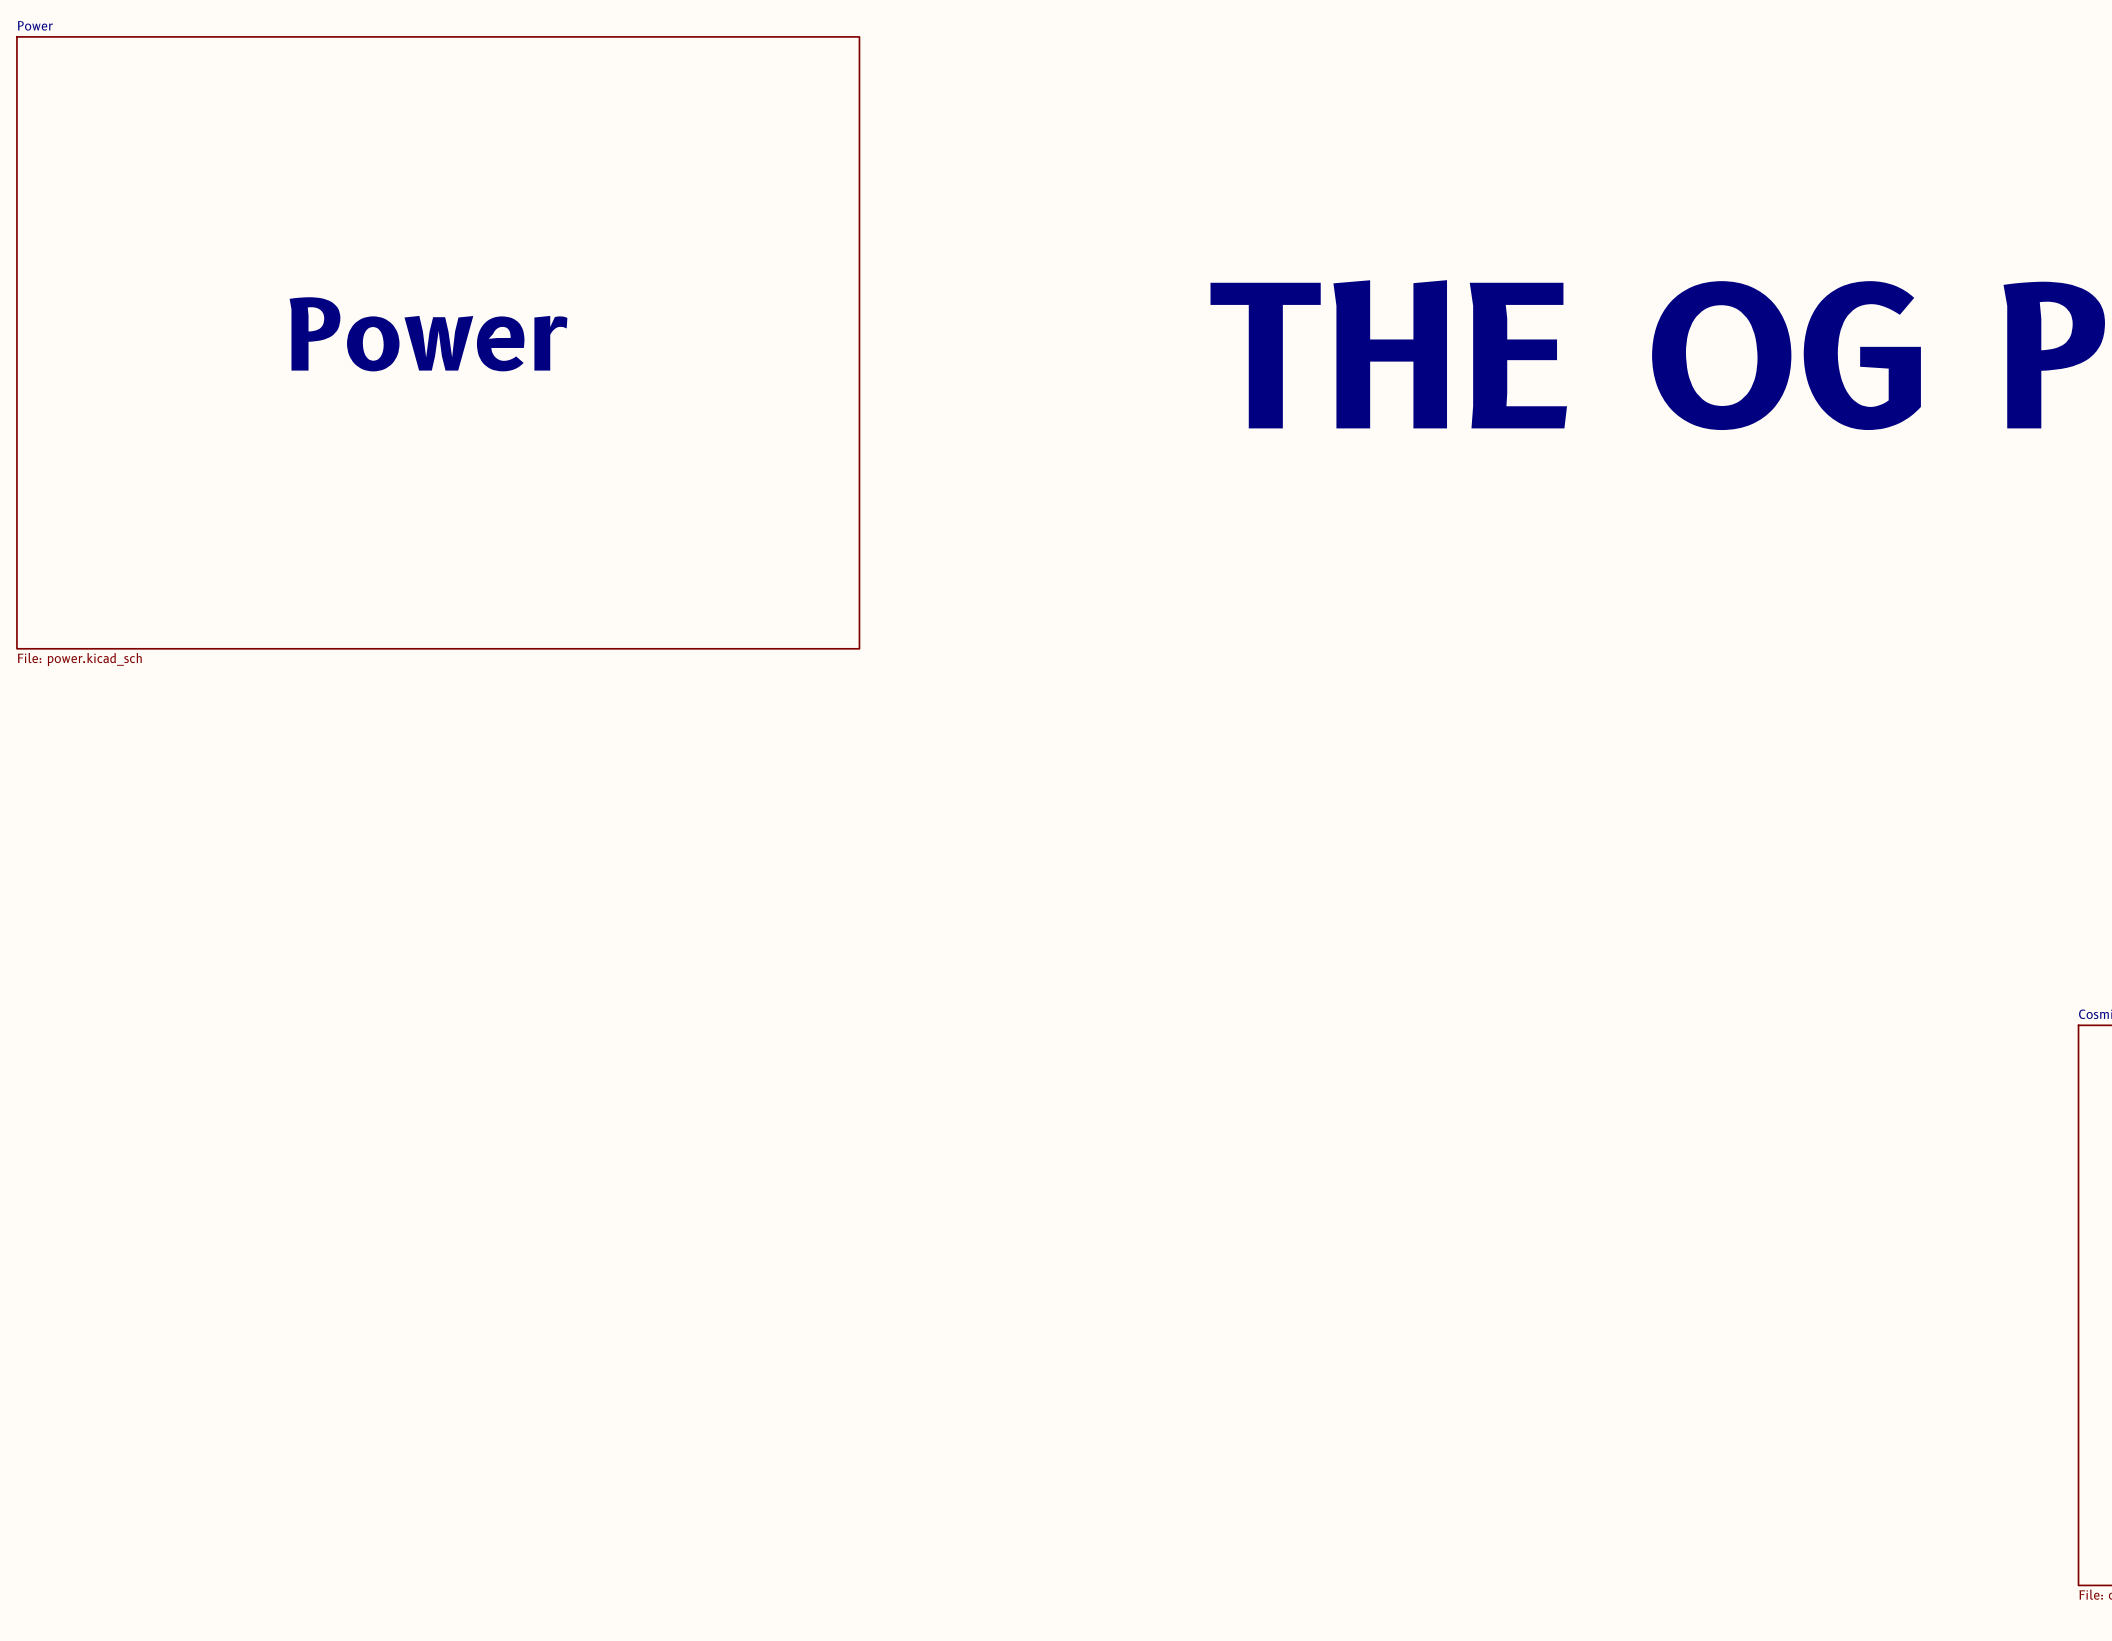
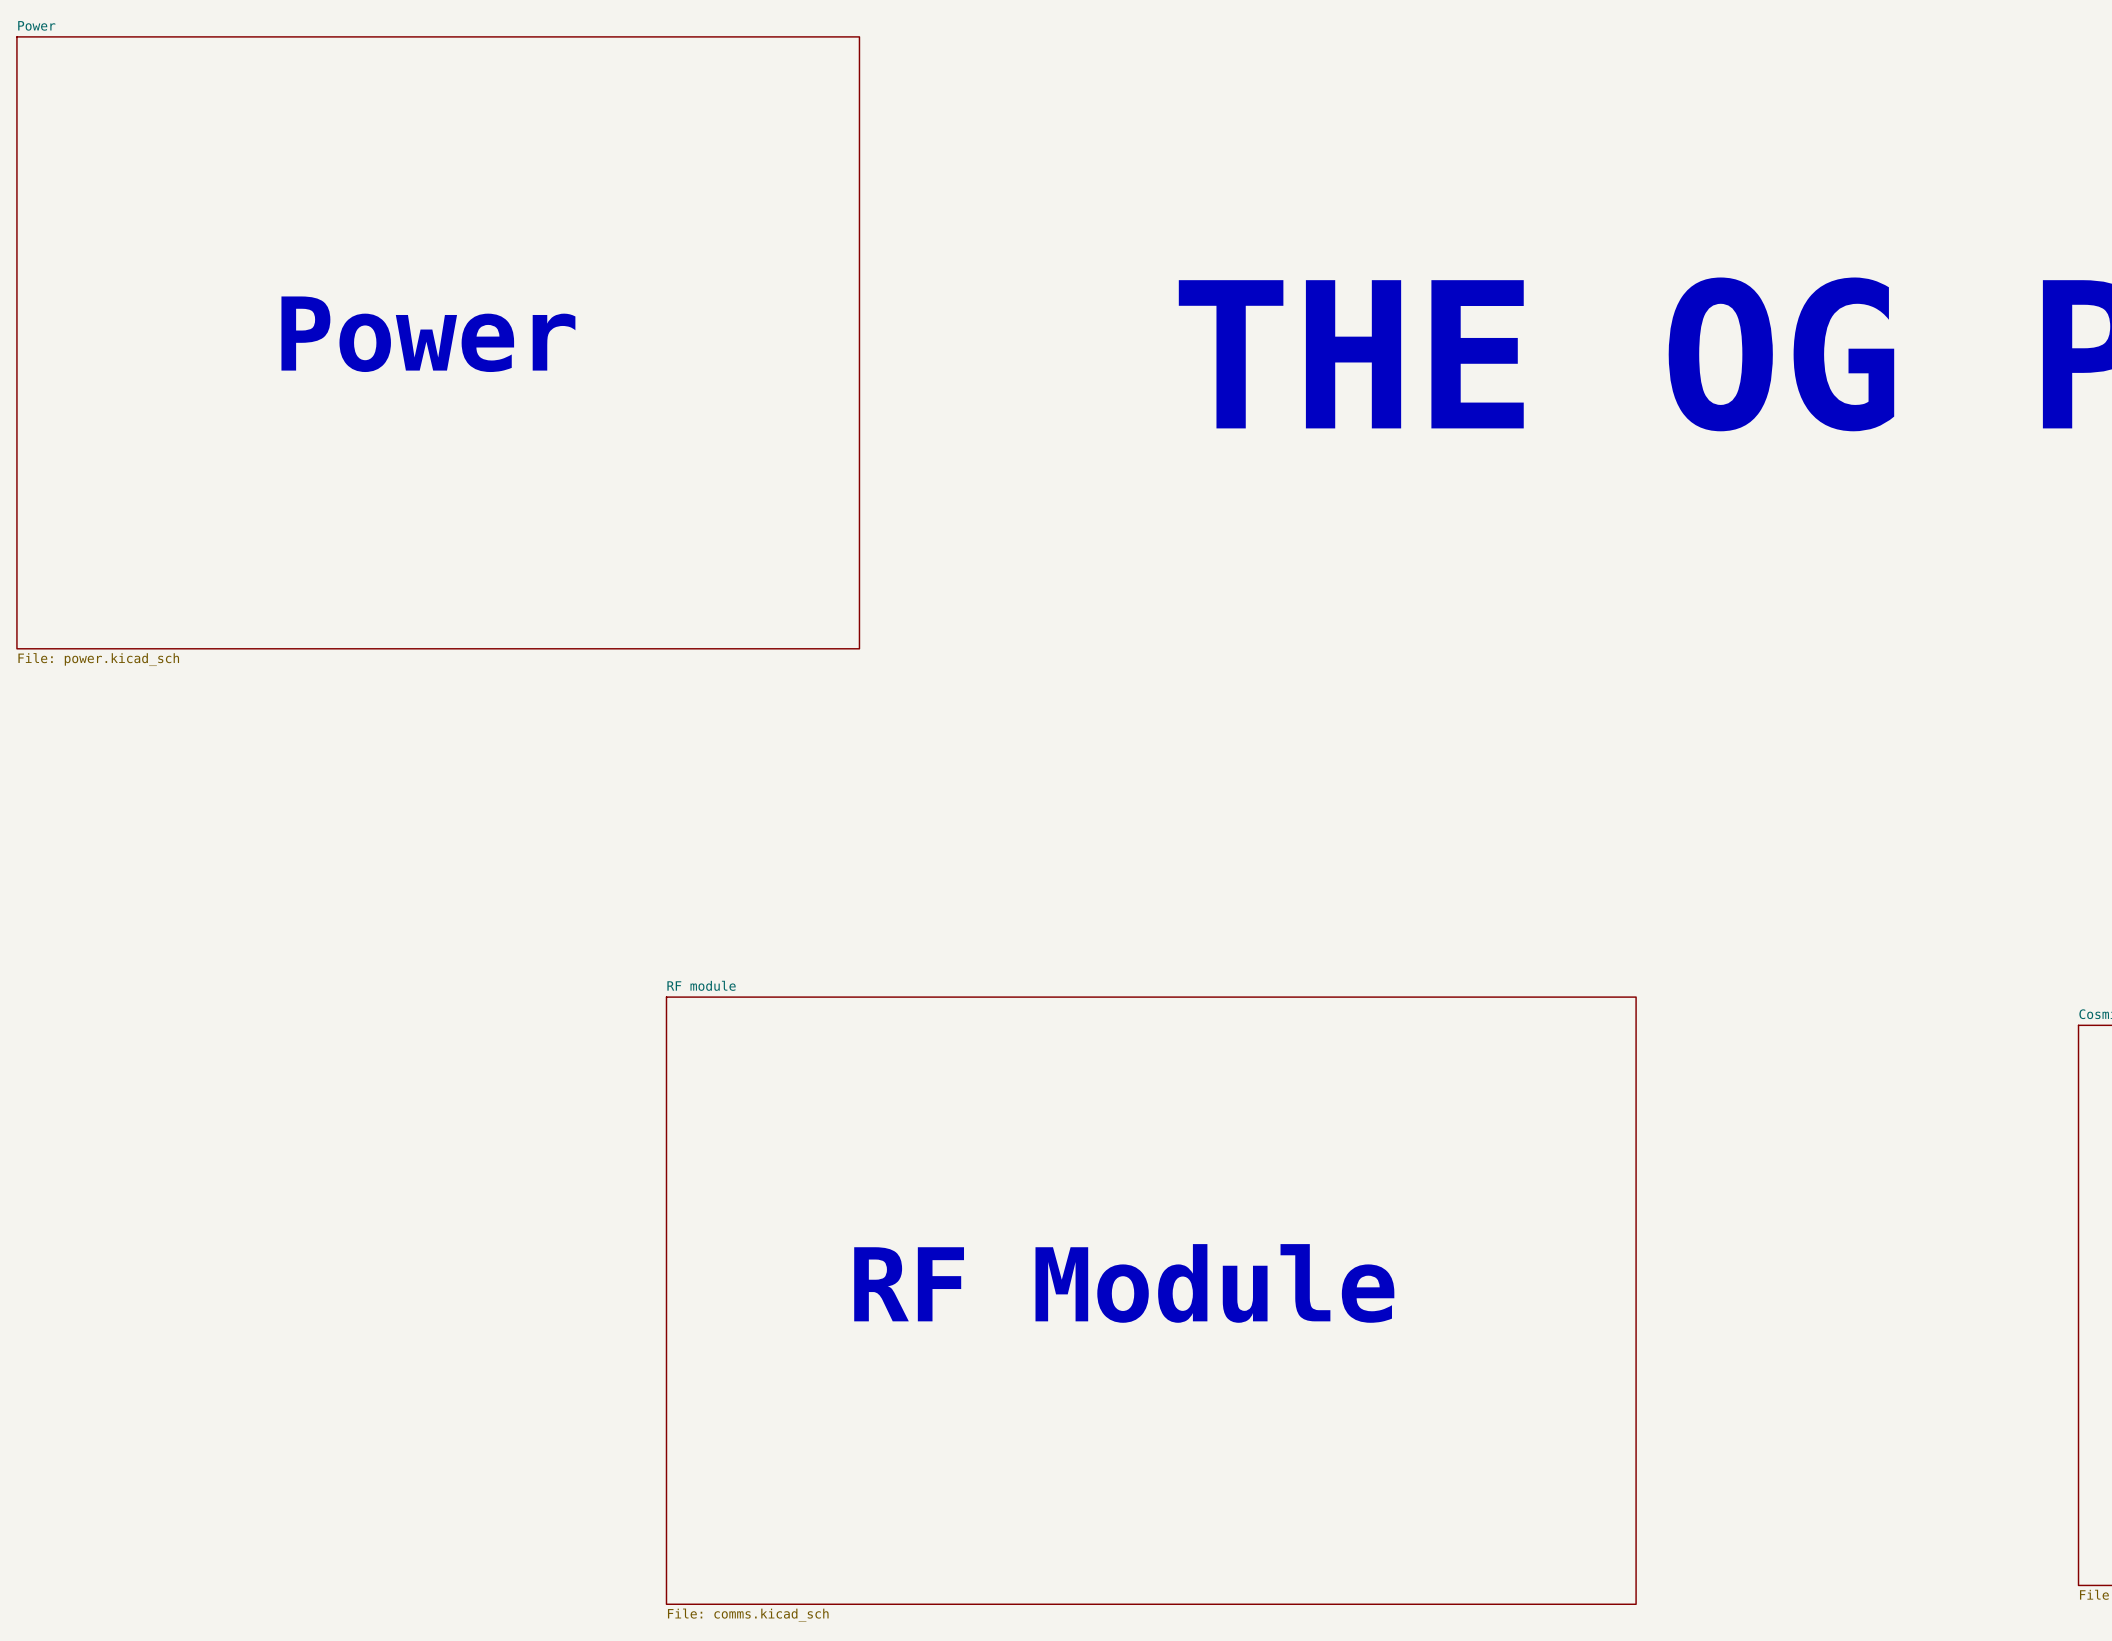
text: none -> RF Module (1124, 1283)
sheet RF module: none -> File: comms.kicad_sch (1151, 1300)

